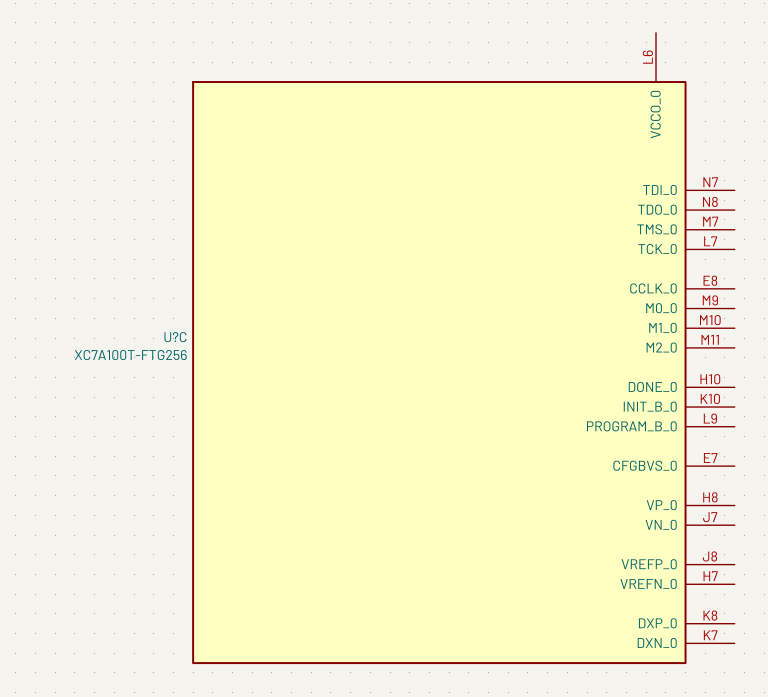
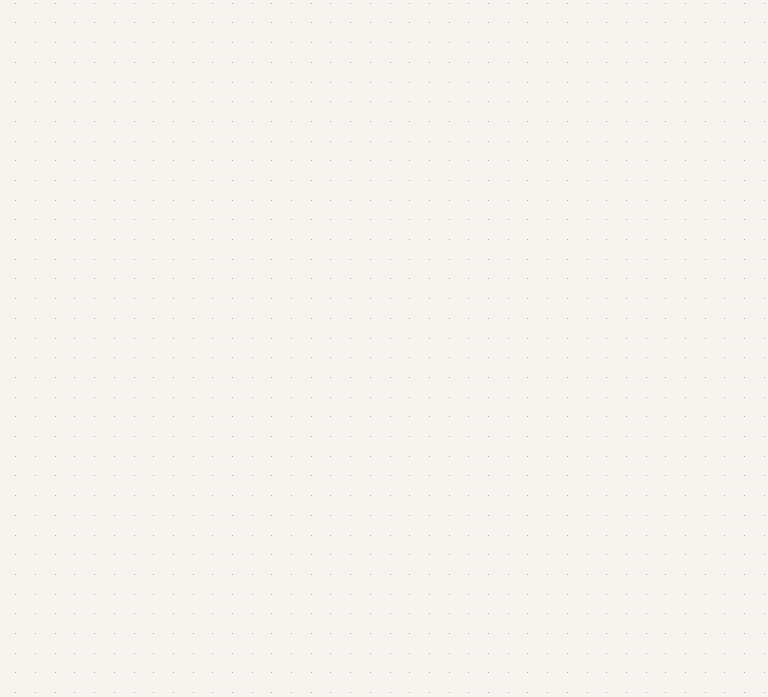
U?C: XC7A100T-FTG256 (463, 348) -> none

